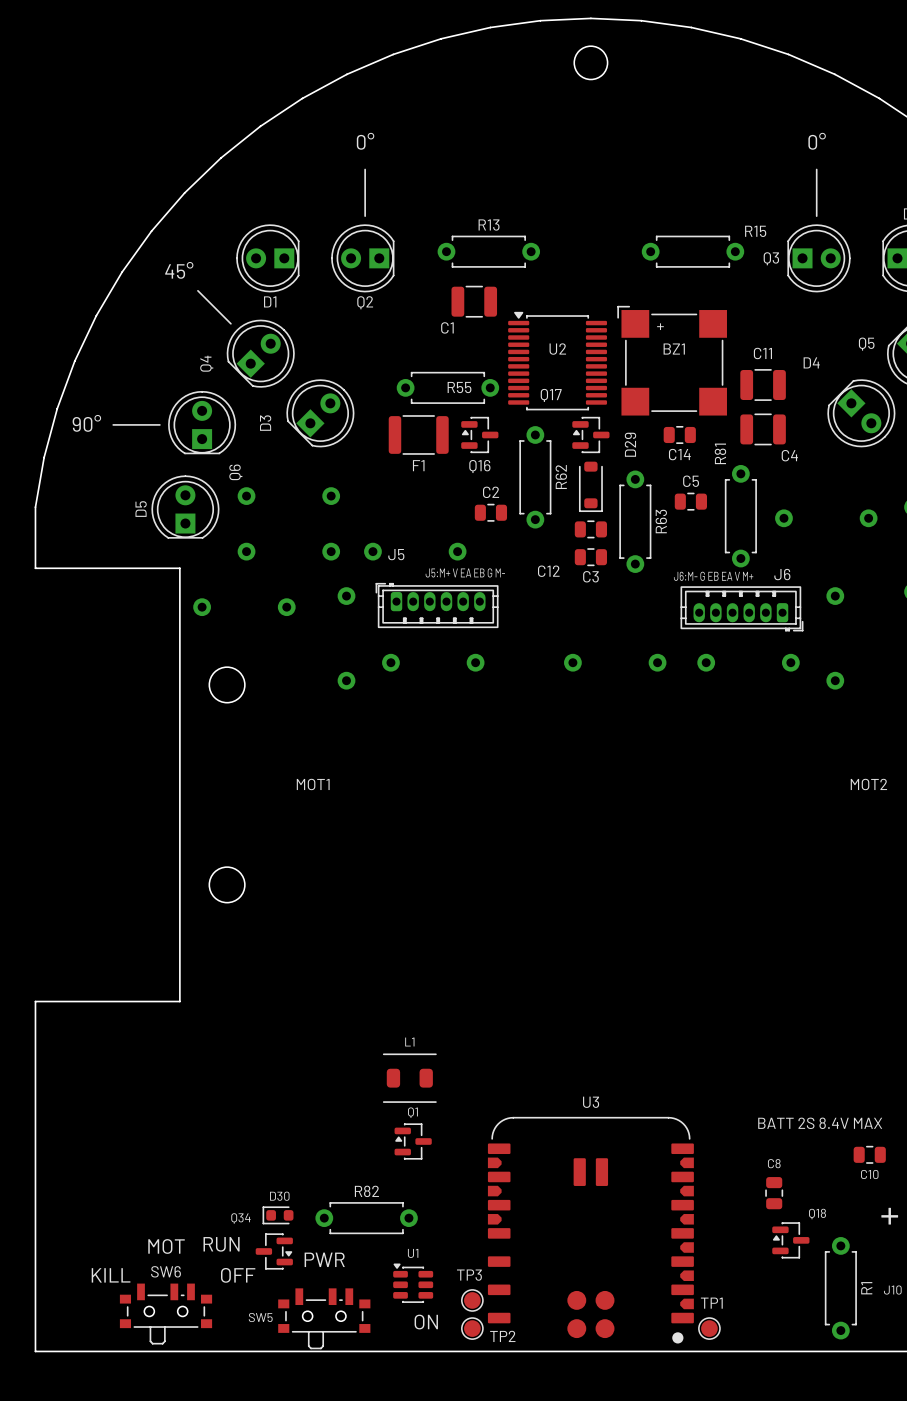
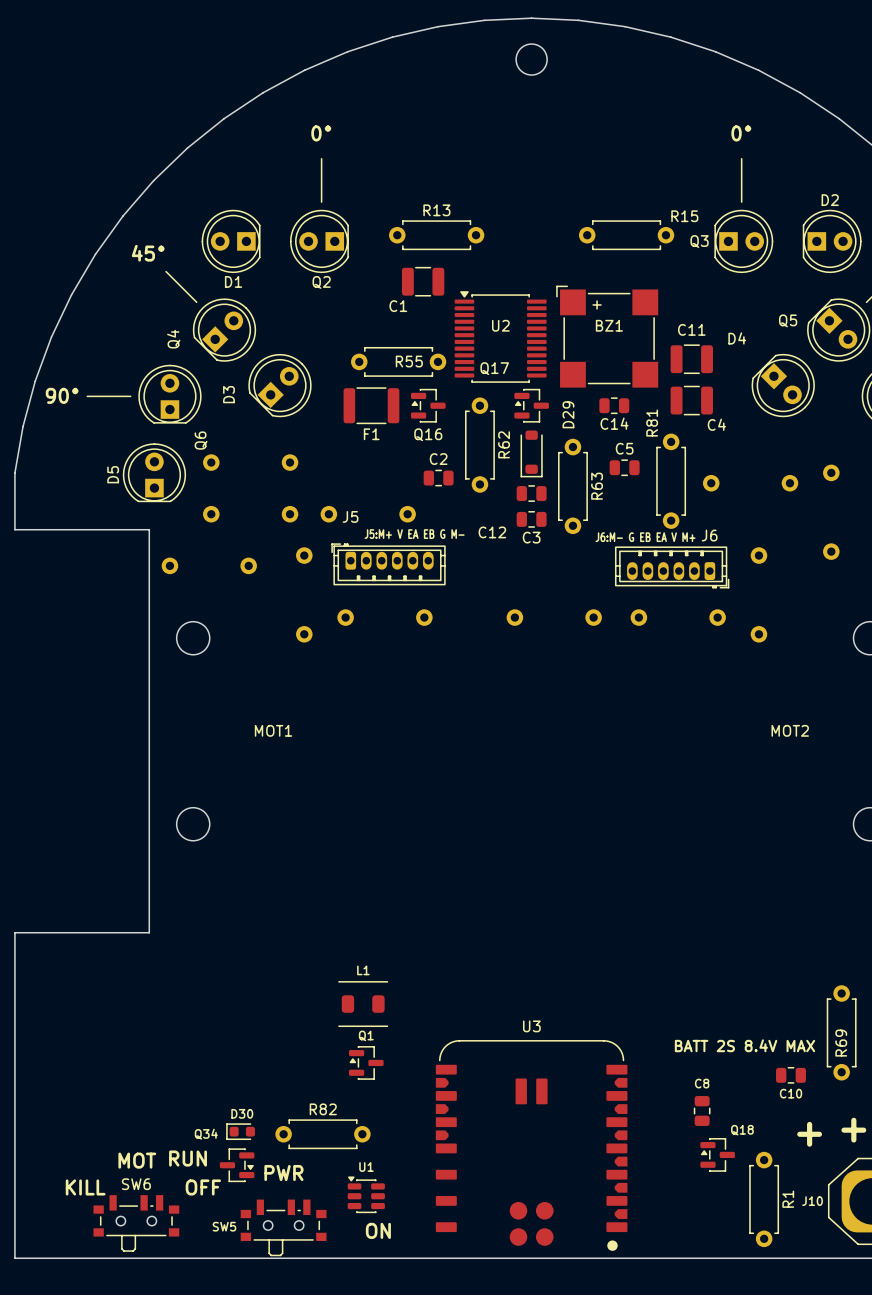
TP3: (472, 1300) -> none
TP2: (472, 1328) -> none
TP1: (709, 1328) -> none

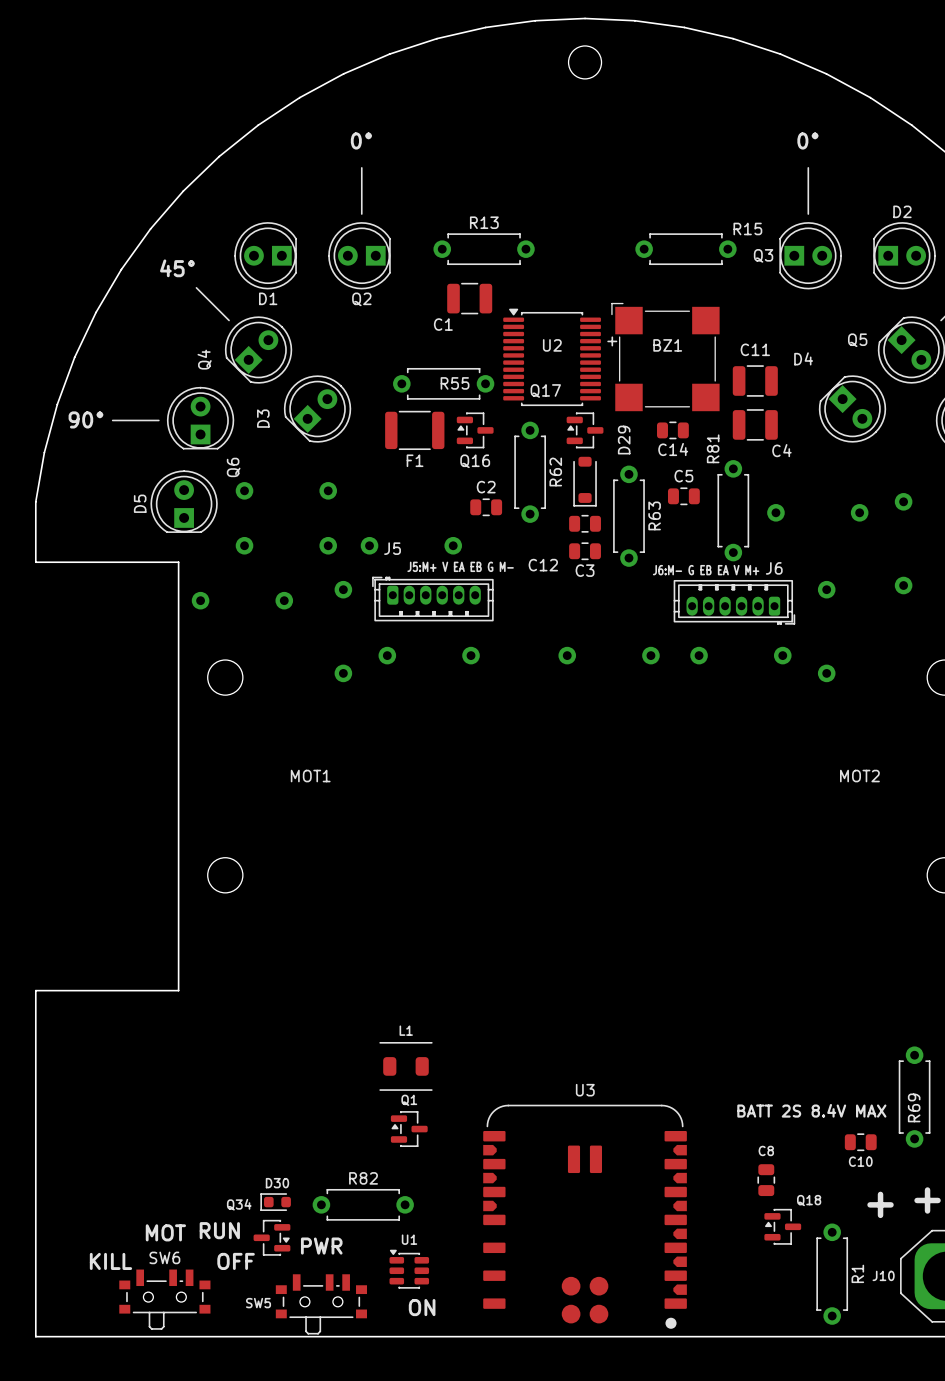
BZ1 footprint: [556, 285, 659, 388] -> [611, 302, 720, 412]

